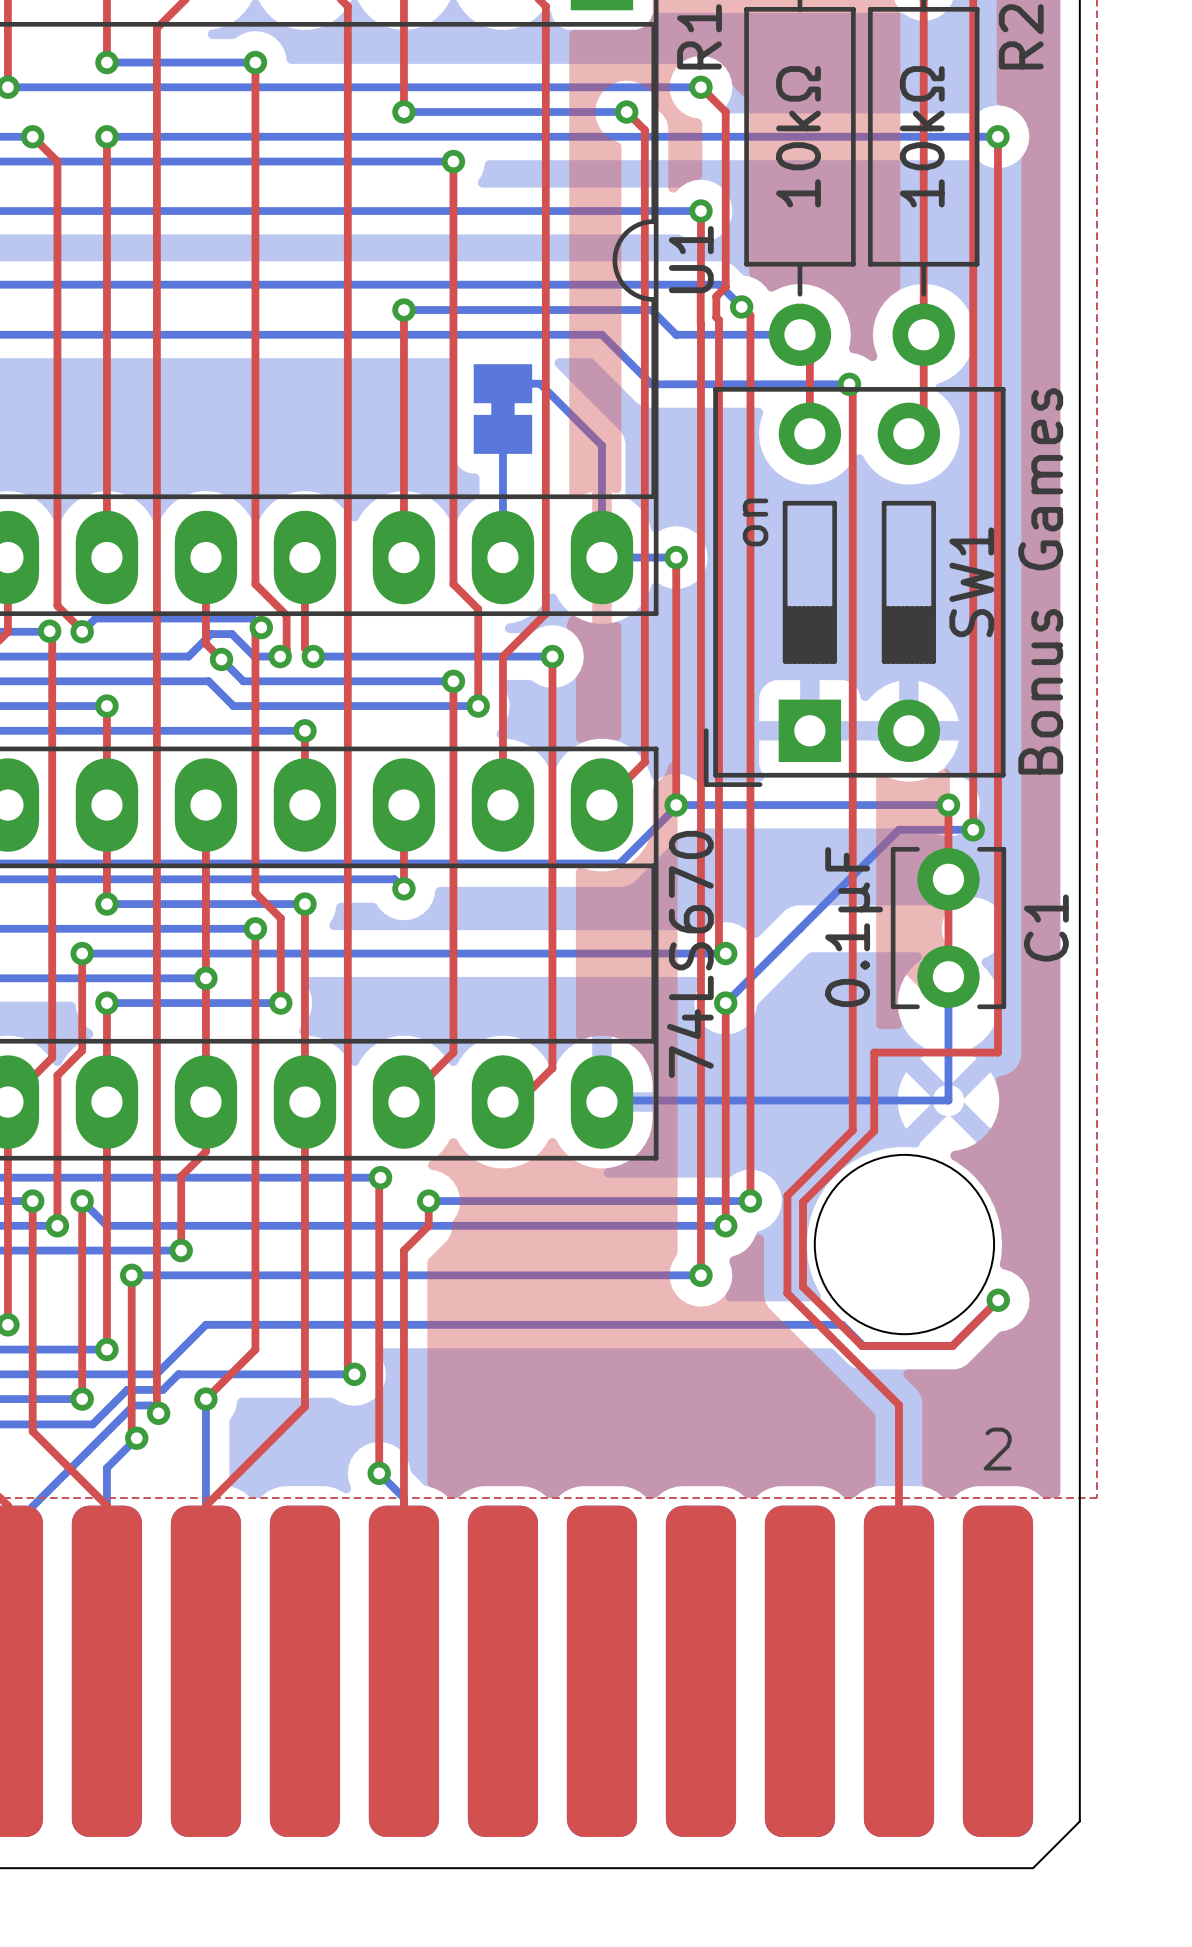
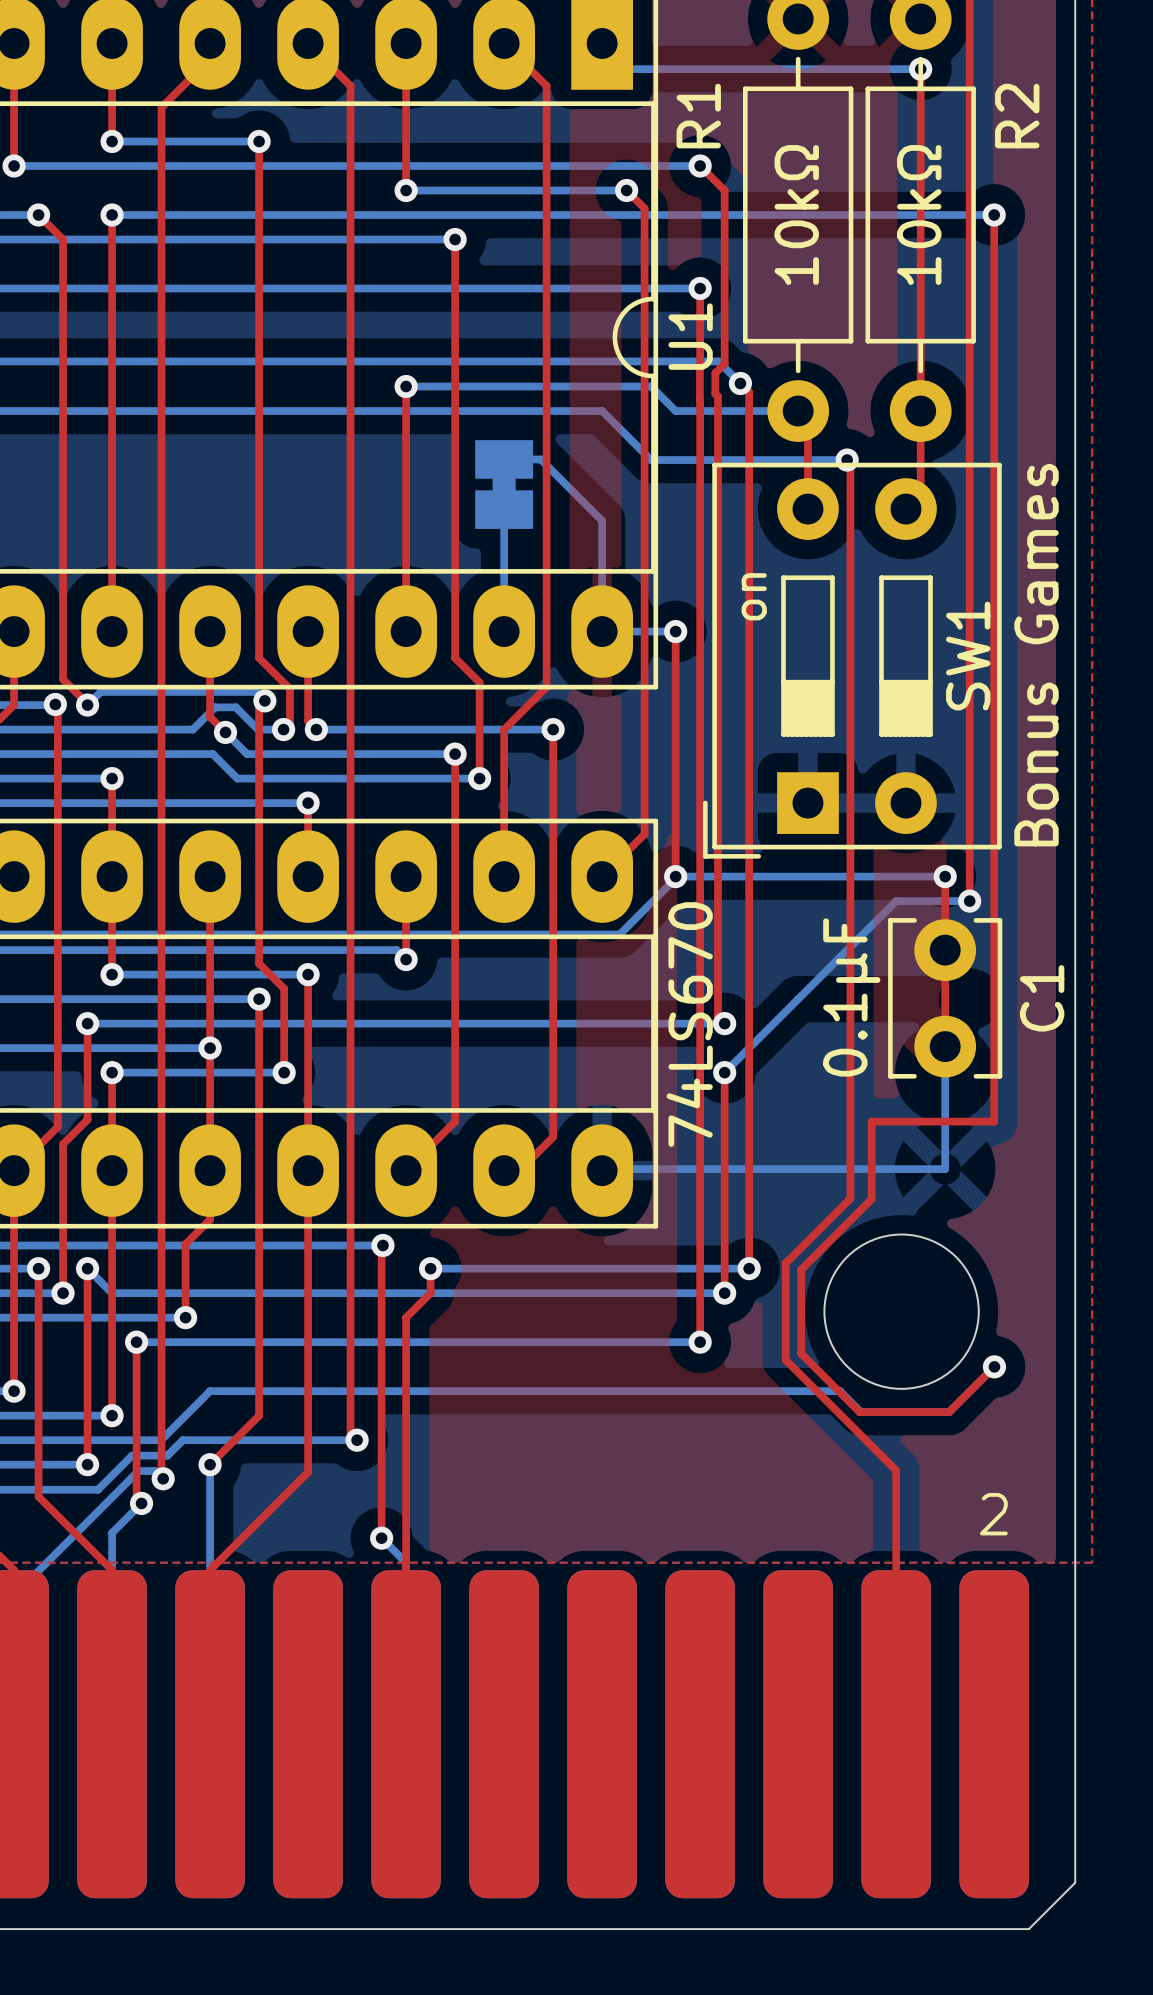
round board edge size: [813, 1153, 996, 1336] -> [823, 1233, 980, 1390]

